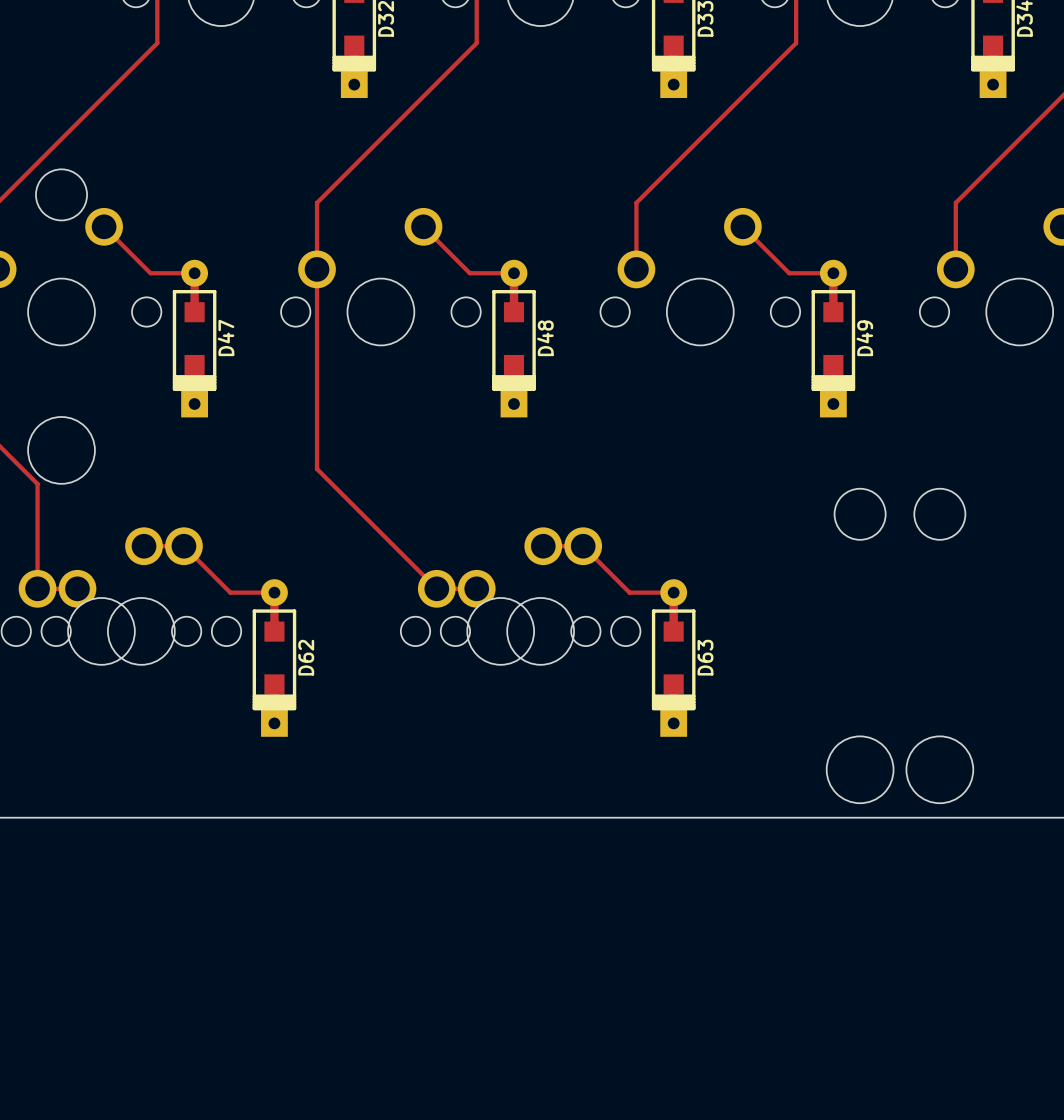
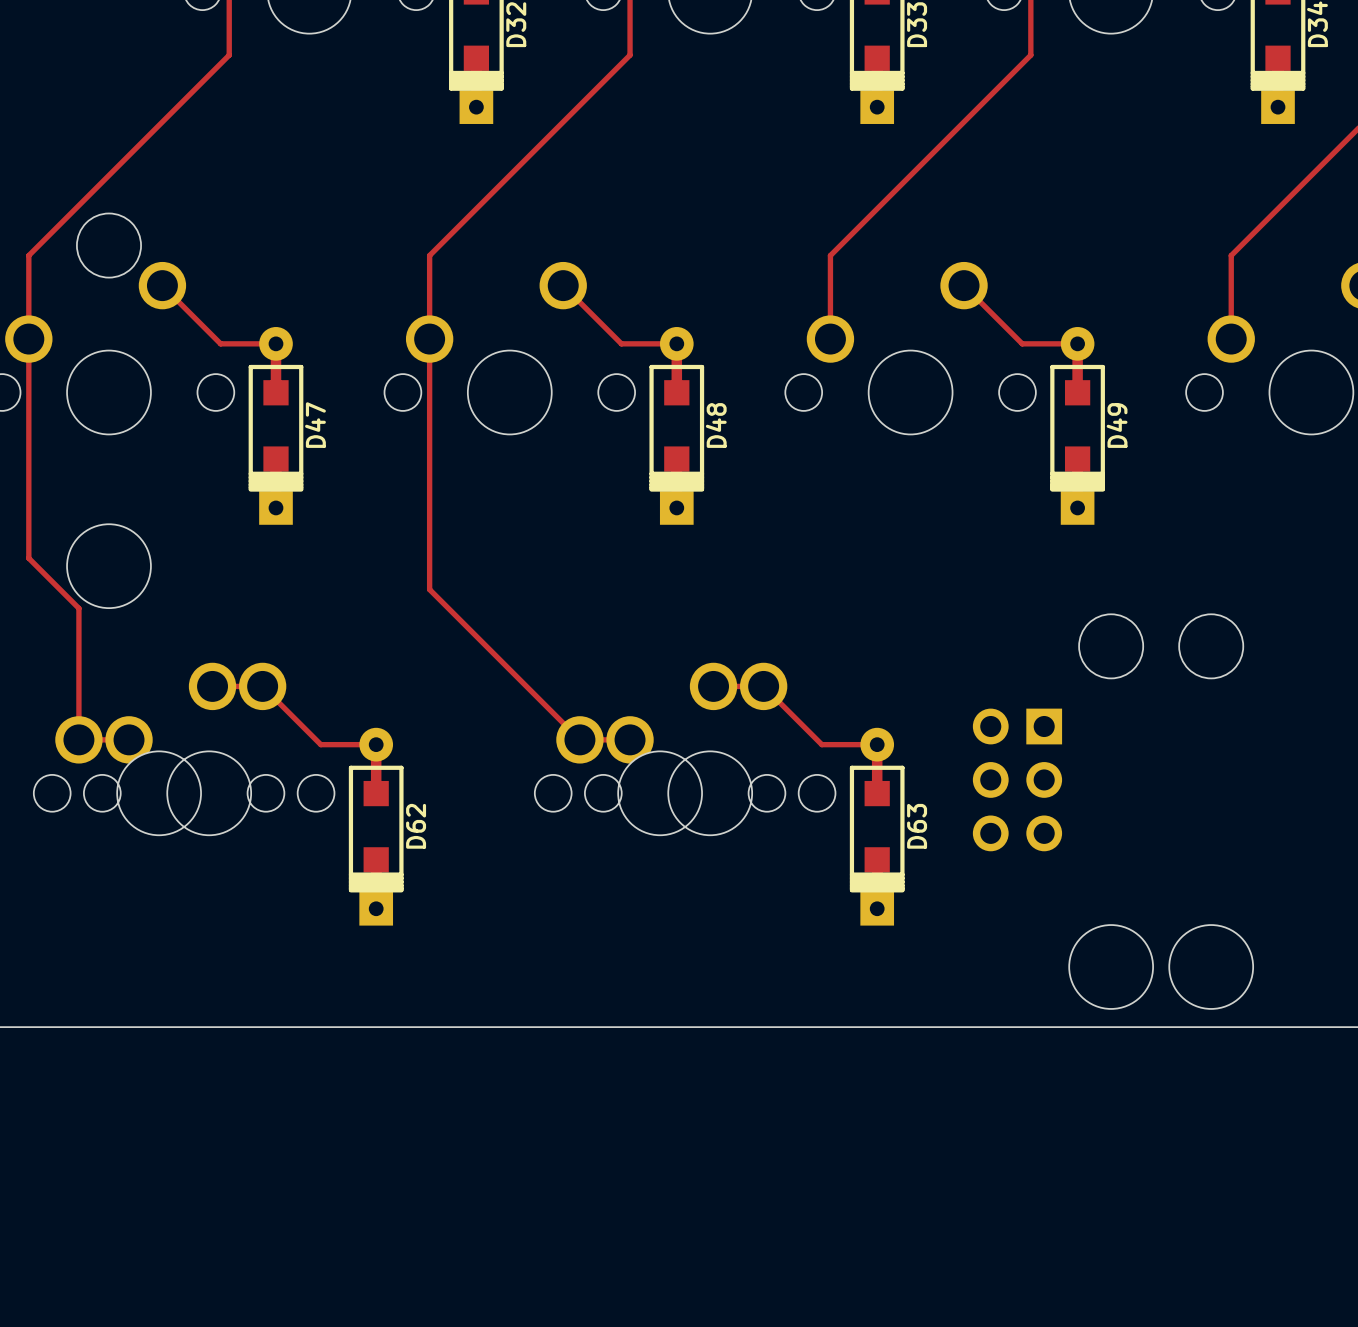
part: none -> (1017, 779)

